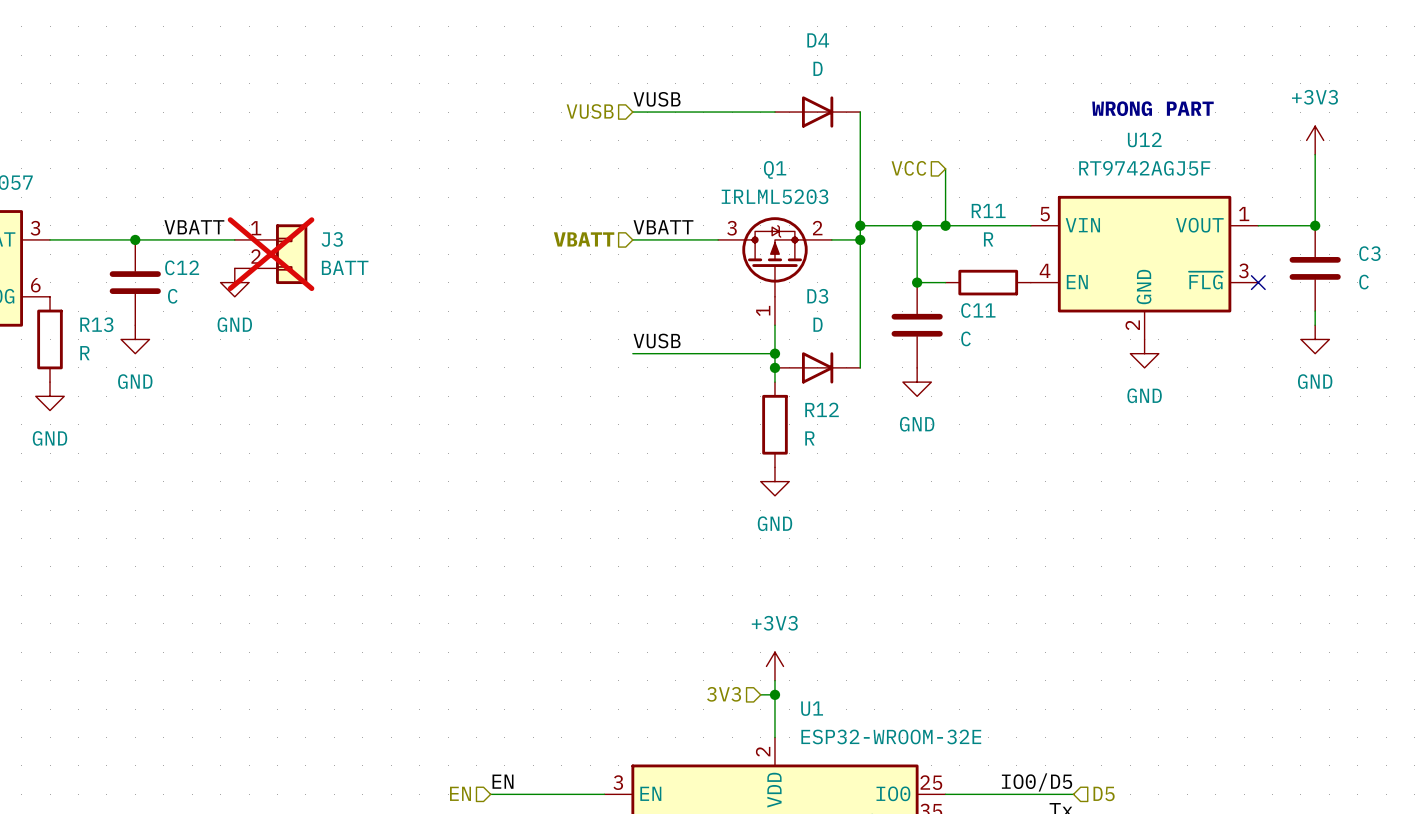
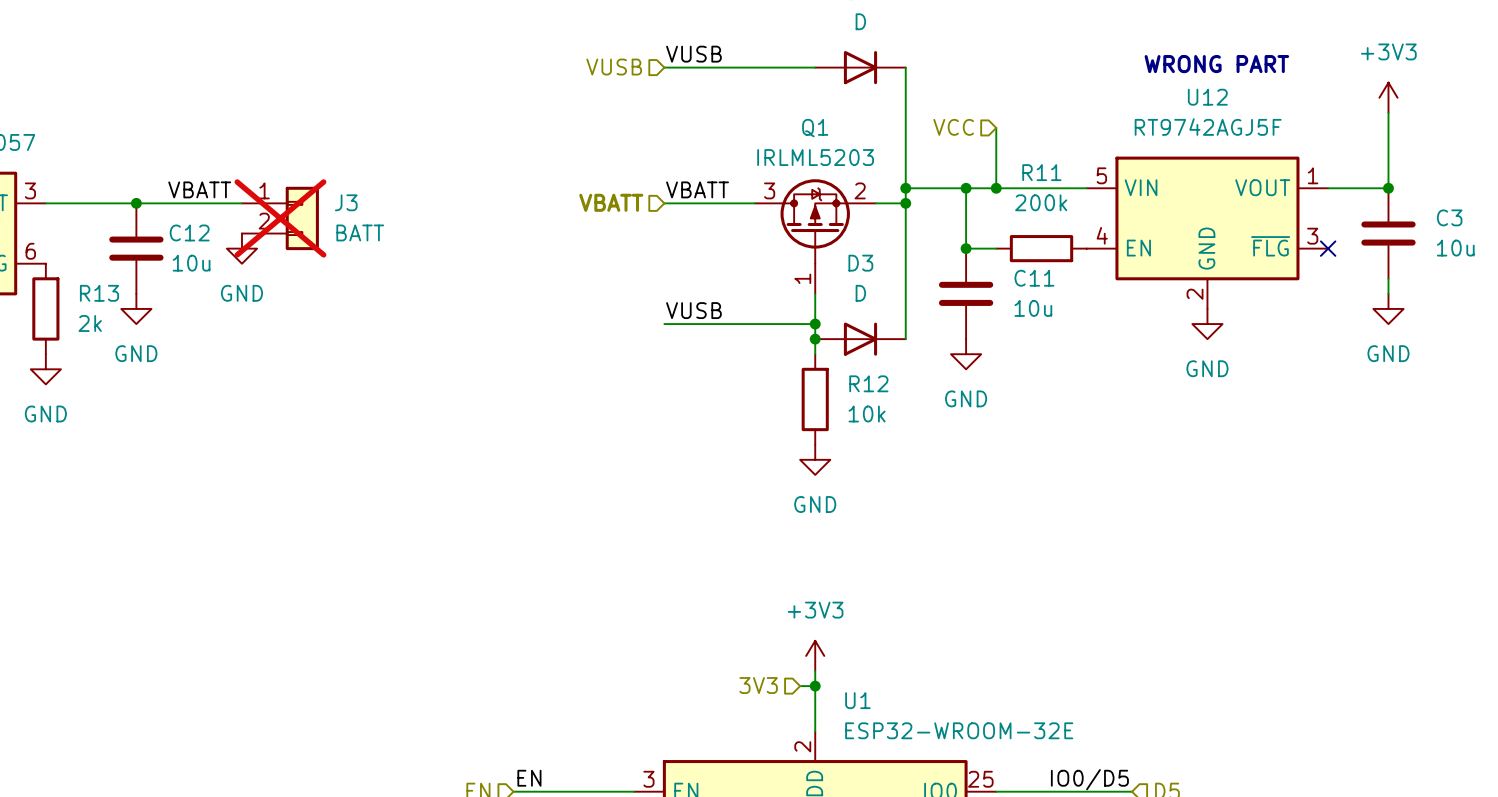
R11 value: R (988, 239) -> 200k (1041, 202)
C3 value: C (1364, 282) -> 10u (1455, 248)
C12 value: C (172, 296) -> 10u (191, 263)
C11 value: C (965, 338) -> 10u (1033, 308)
R13 value: R (84, 353) -> 2k (90, 323)
R12 value: R (809, 438) -> 10k (867, 414)

